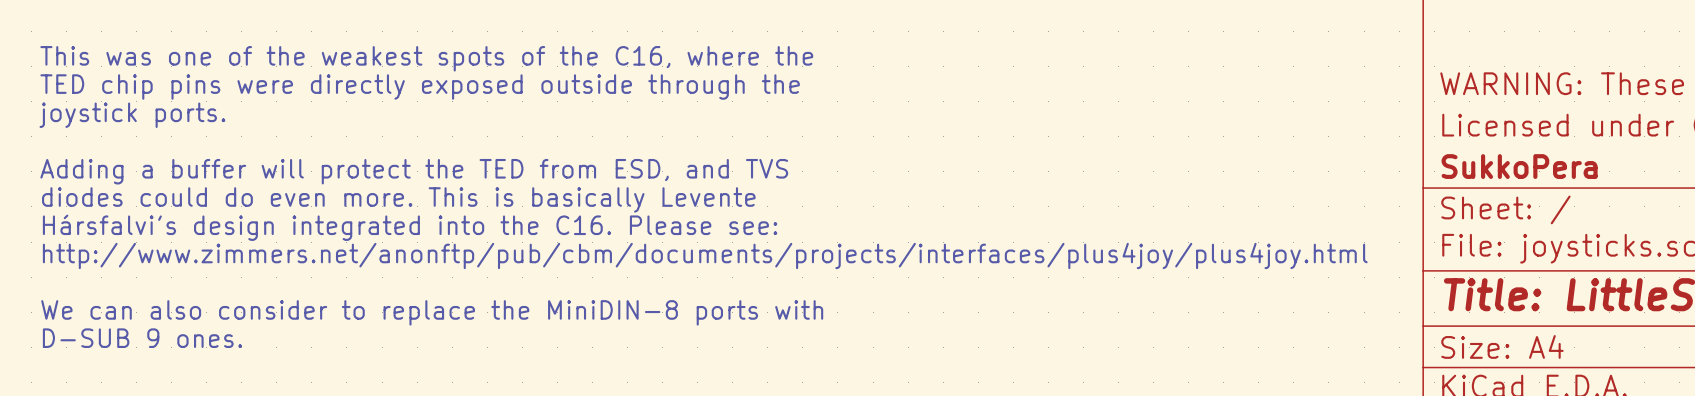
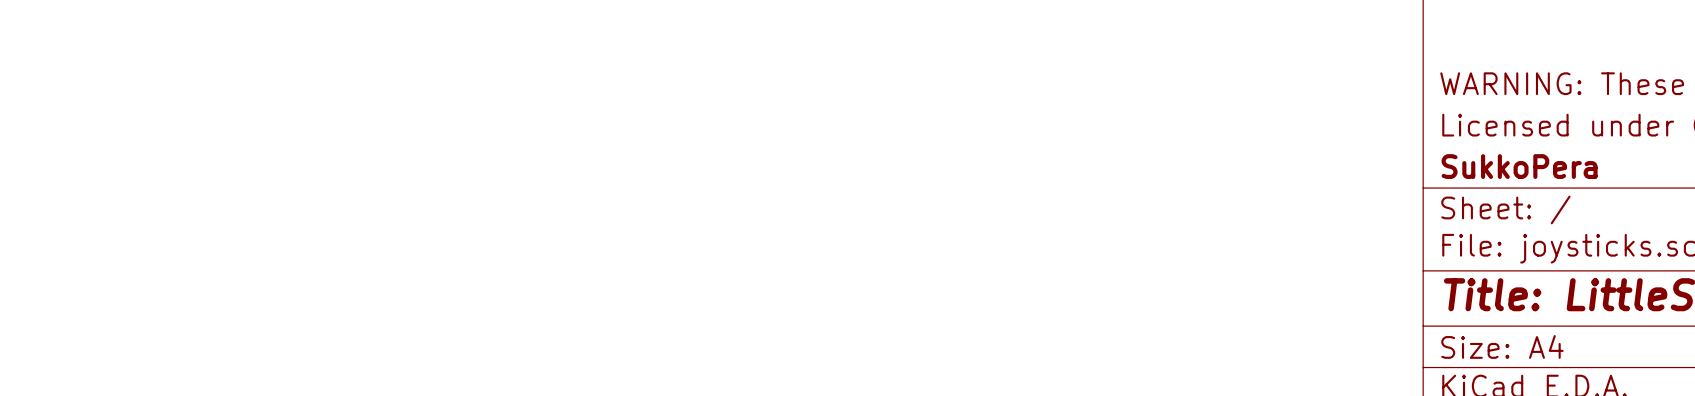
text: This was one of the weakest spots of the C16, where the (426, 58) -> none
text: TED chip pins were directly exposed outside through the (420, 87) -> none
text: joystick ports. (132, 115) -> none
text: Adding a buffer will protect the TED from ESD, and TVS (414, 171) -> none
text: diodes could do even more. This is basically Levente (398, 199) -> none
text: Hársfalvi's design integrated into the C16. Please see: (410, 227) -> none
text: http://www.zimmers.net/anonftp/pub/cbm/documents/projects/interfaces/plus4joy/plus4joy.html (705, 255) -> none
text: We can also consider to replace the MiniDIN-8 ports with (432, 312) -> none
text: D-SUB 9 ones. (142, 338) -> none

